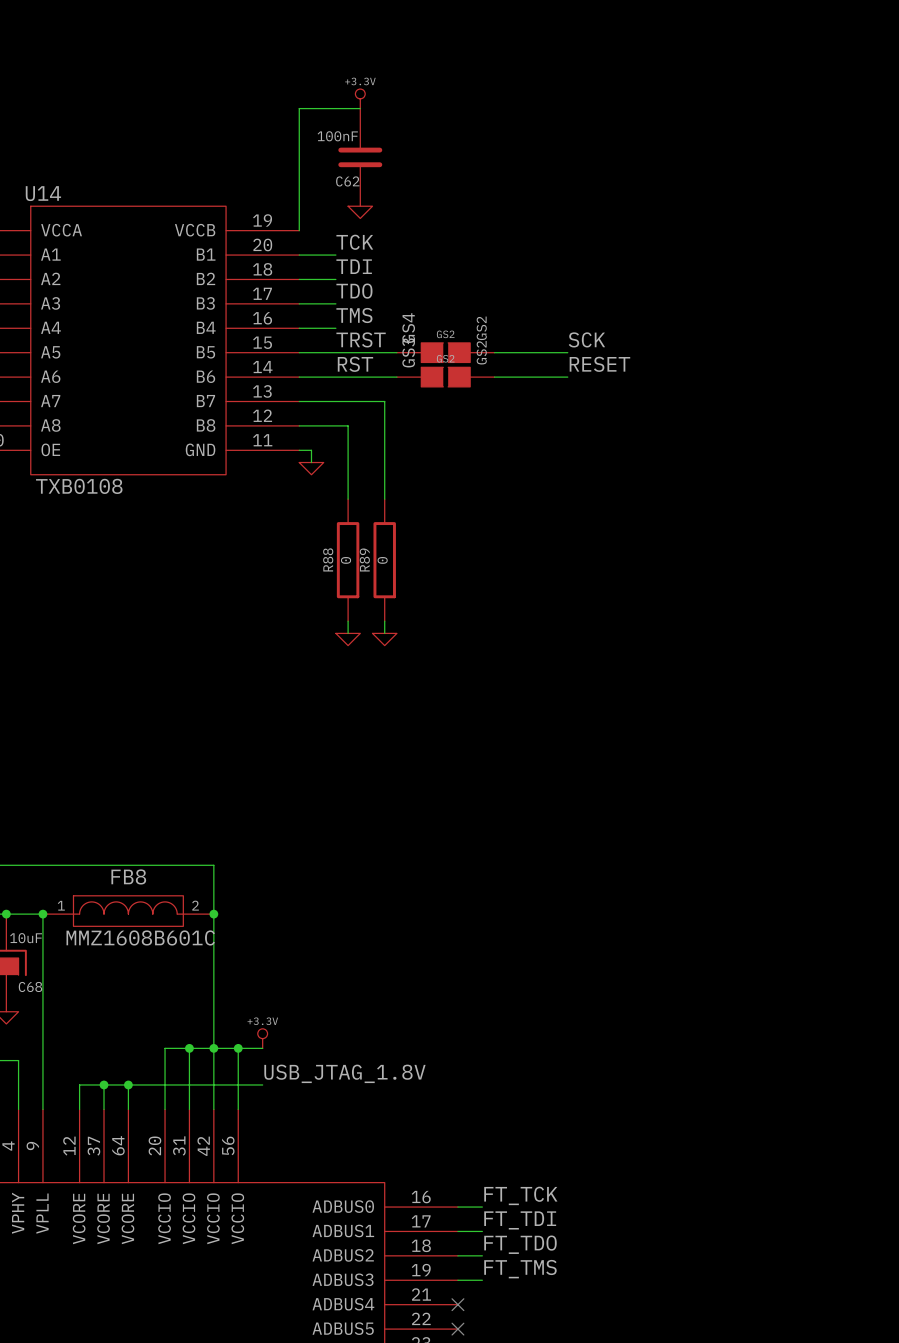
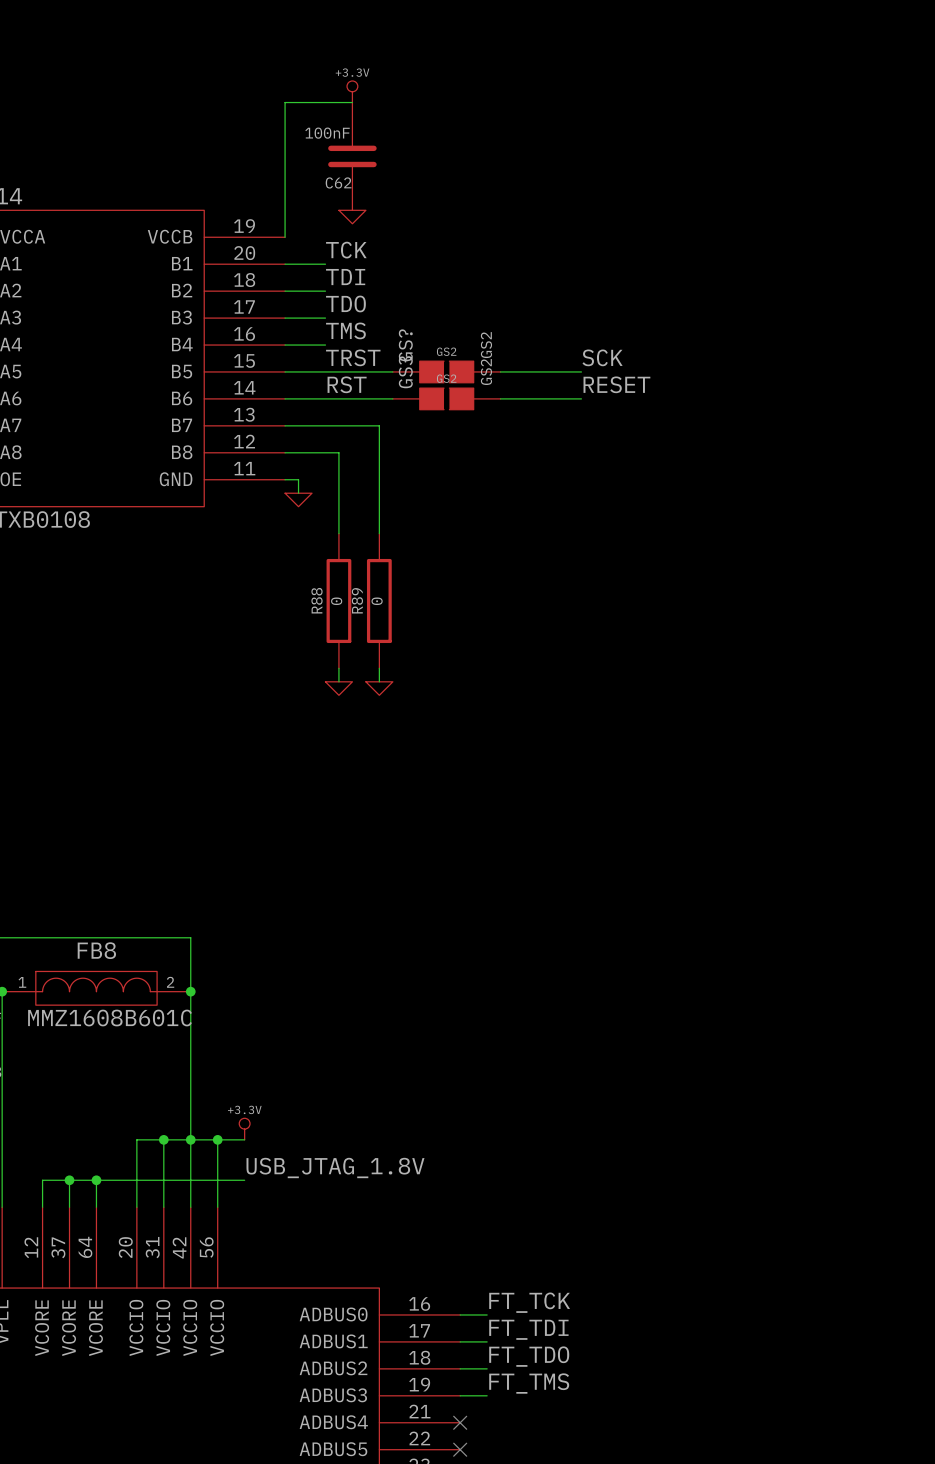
GS4 name: GS4 (408, 328) -> GS? (405, 345)

